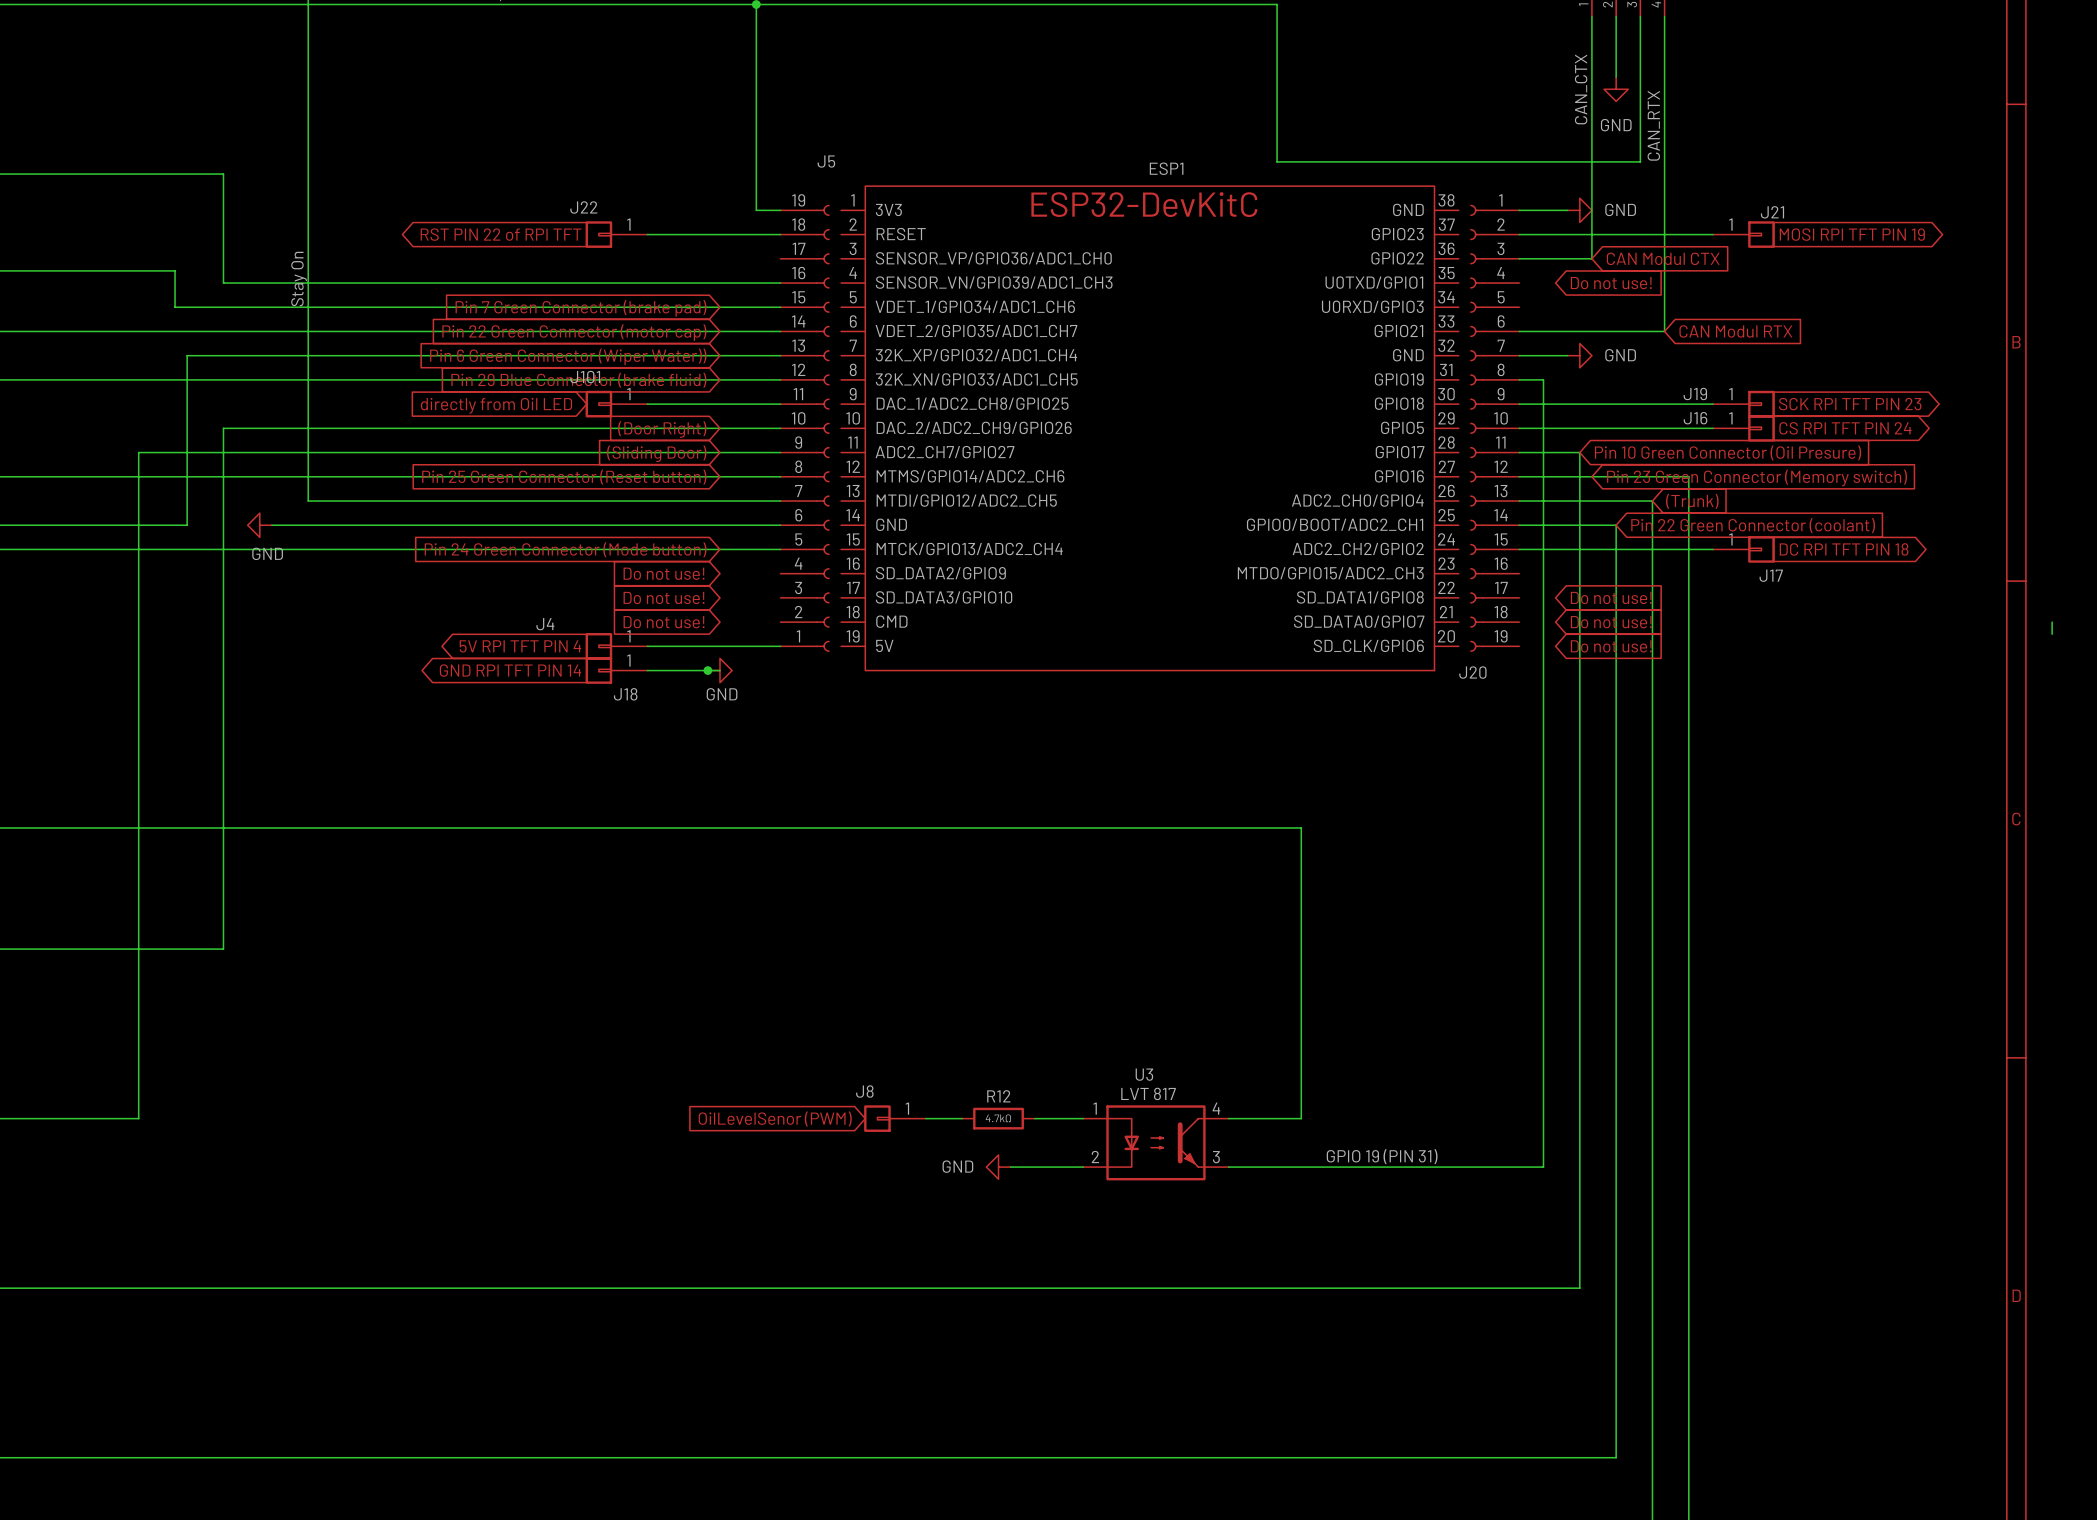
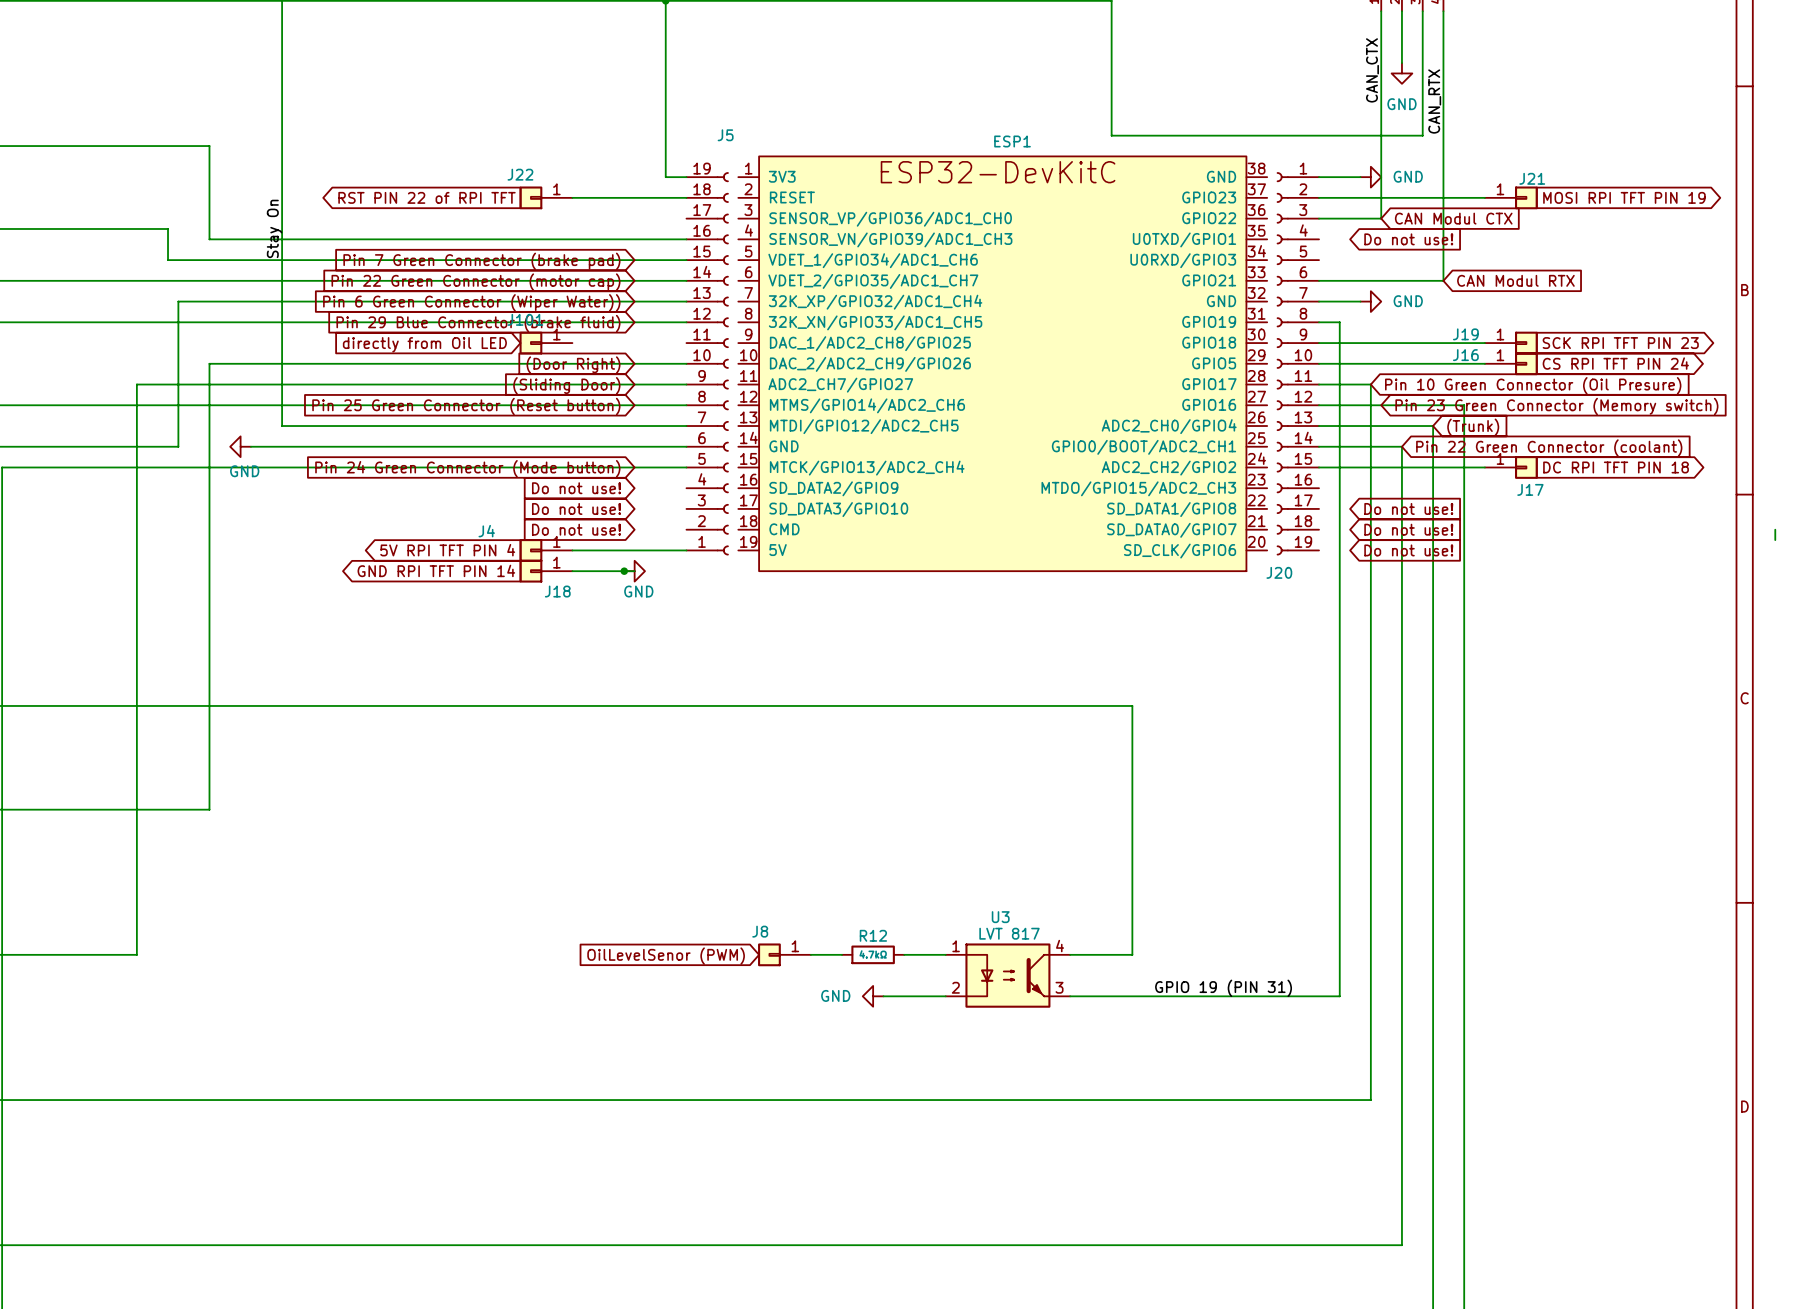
wire: (647, 404) (780, 404) -> none

